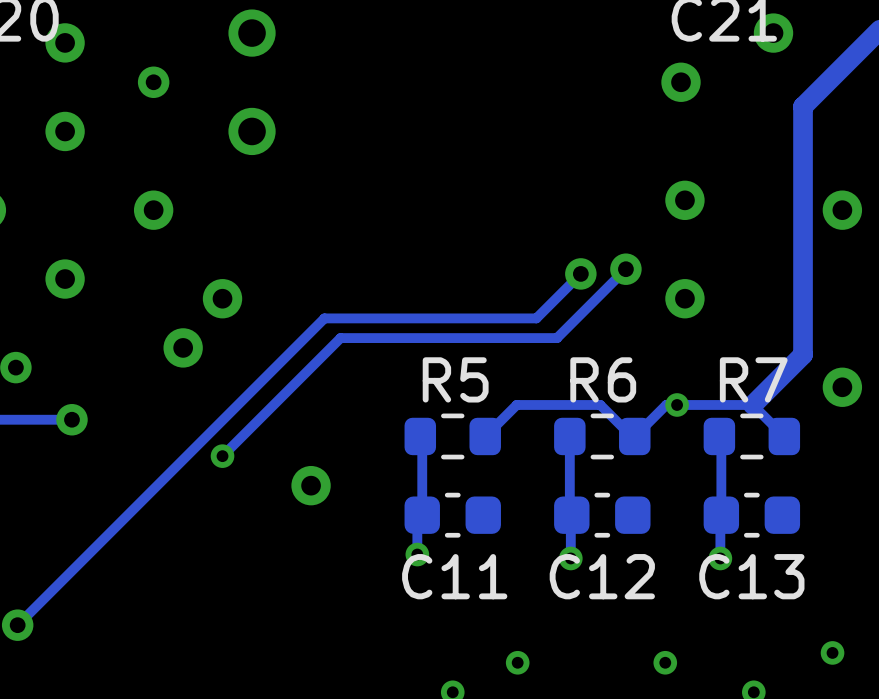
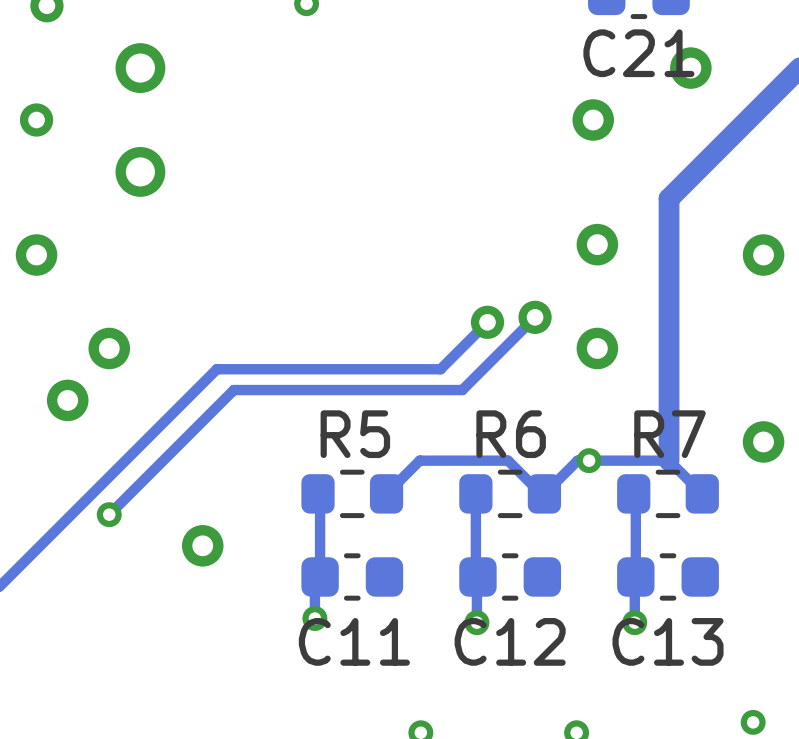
track: (803, 106) (803, 354) (752, 404) -> (722, 145) (669, 198) (669, 460)

